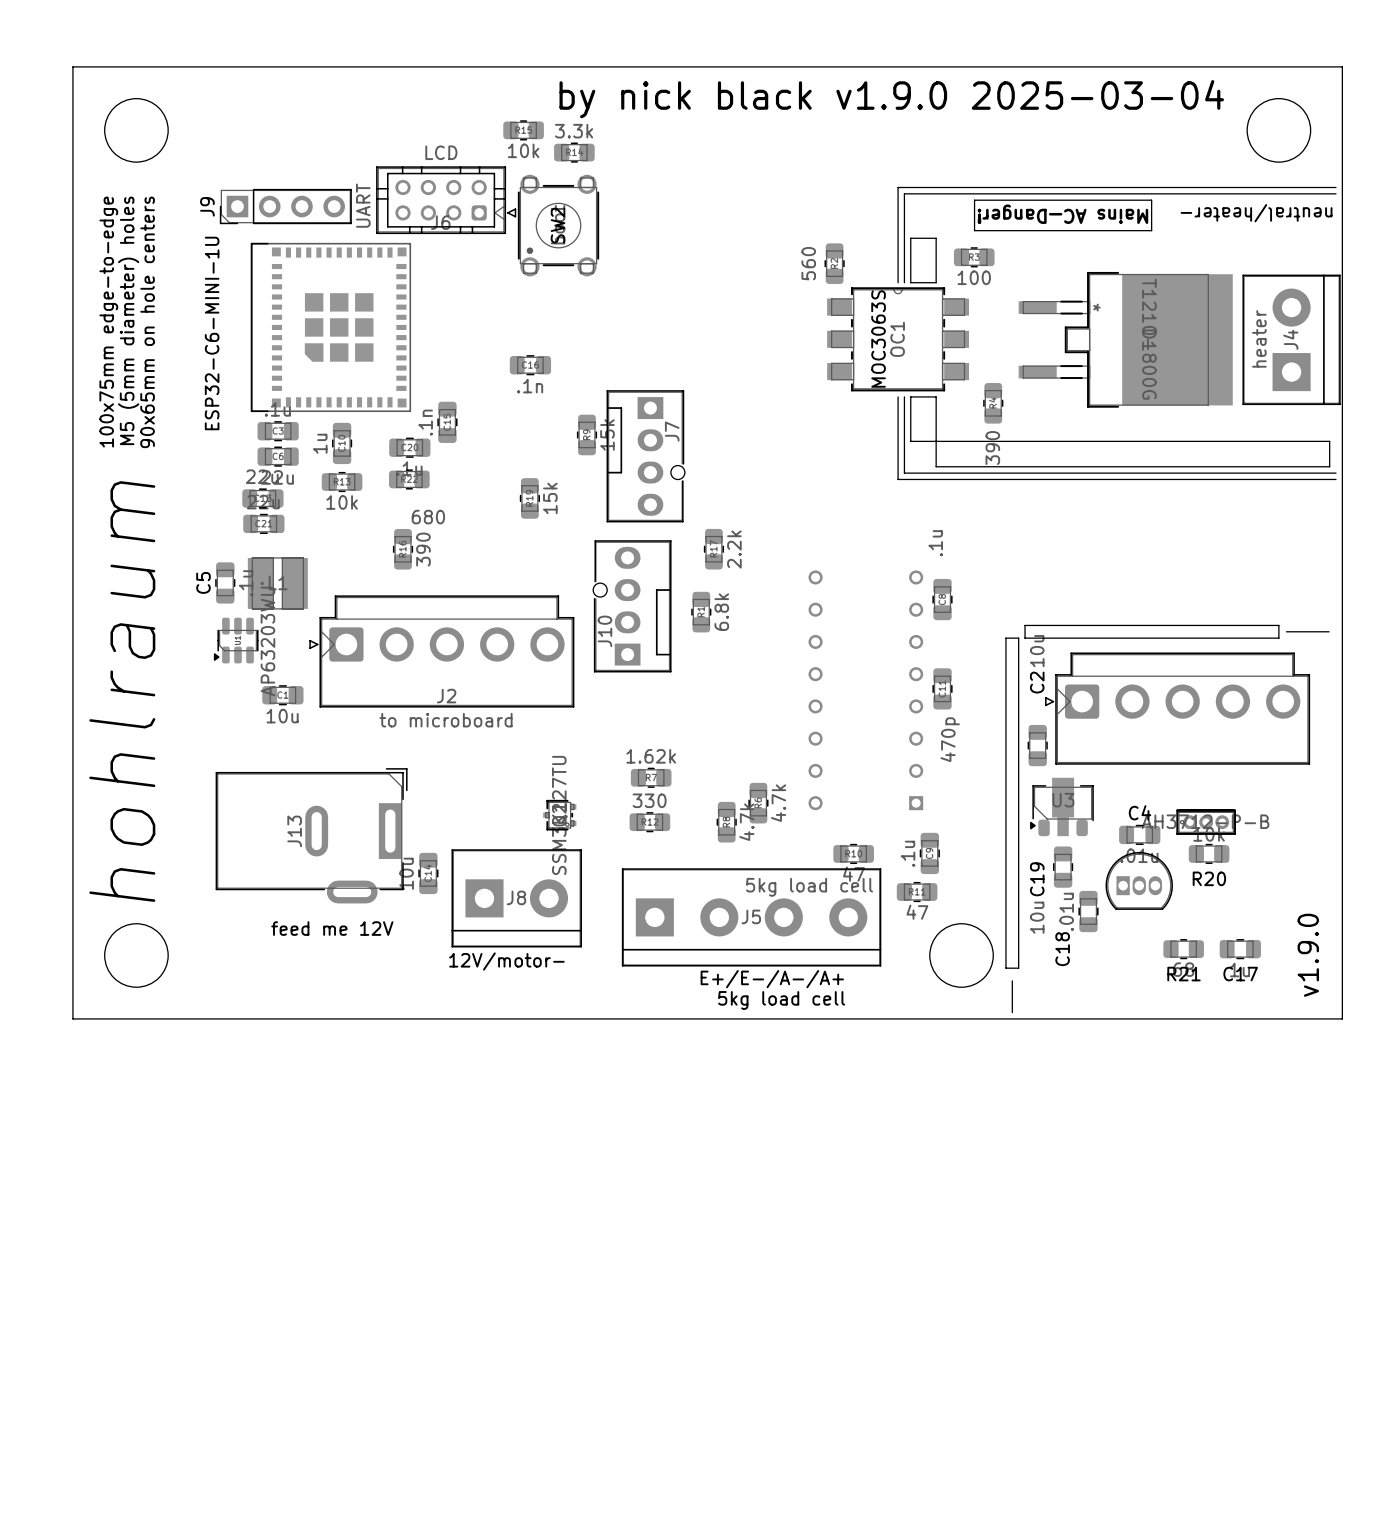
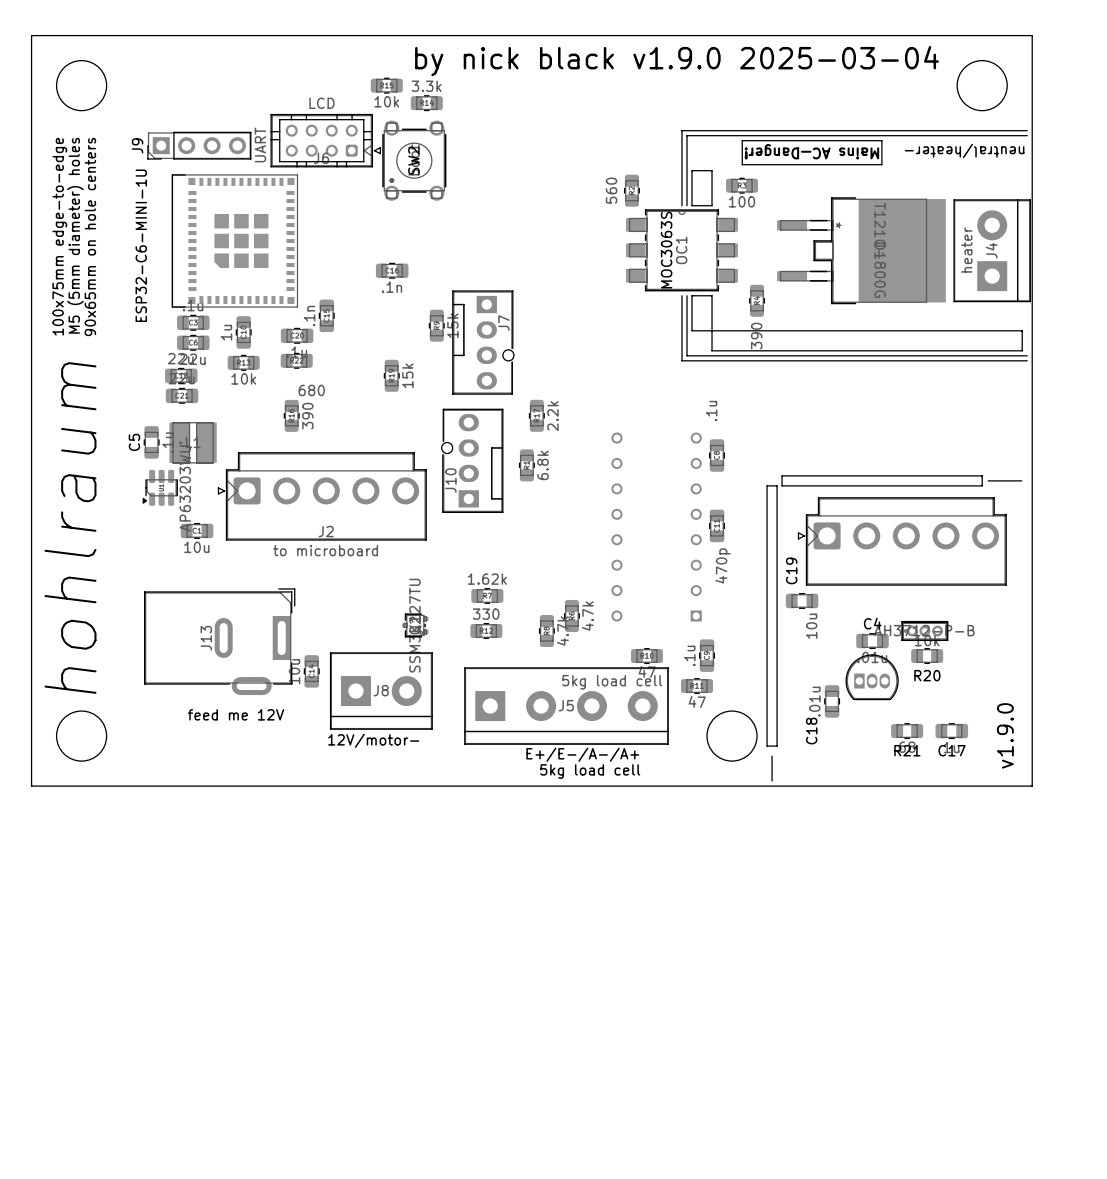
C2: 10u (1037, 745) -> none
part: (1061, 806) -> none
C19 rotation: 0° (1063, 867) -> 90° clockwise (802, 600)
C19 position: (1063, 867) -> (802, 600)
C19 value position: 10u (1037, 917) -> 10u (811, 626)

